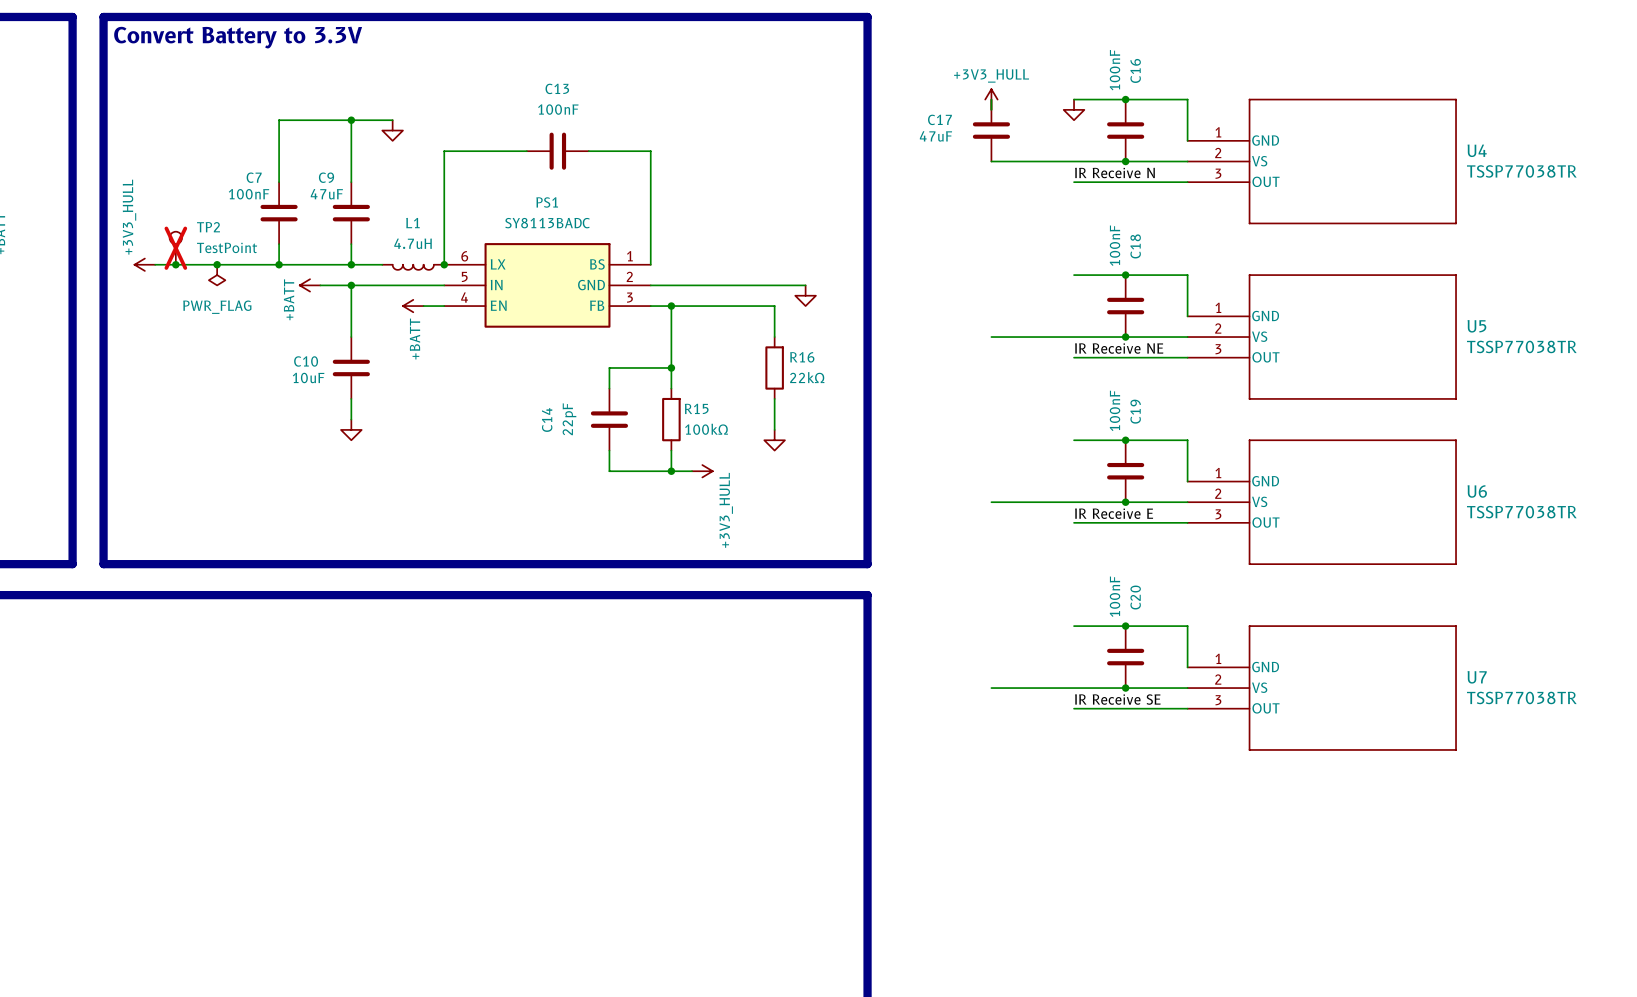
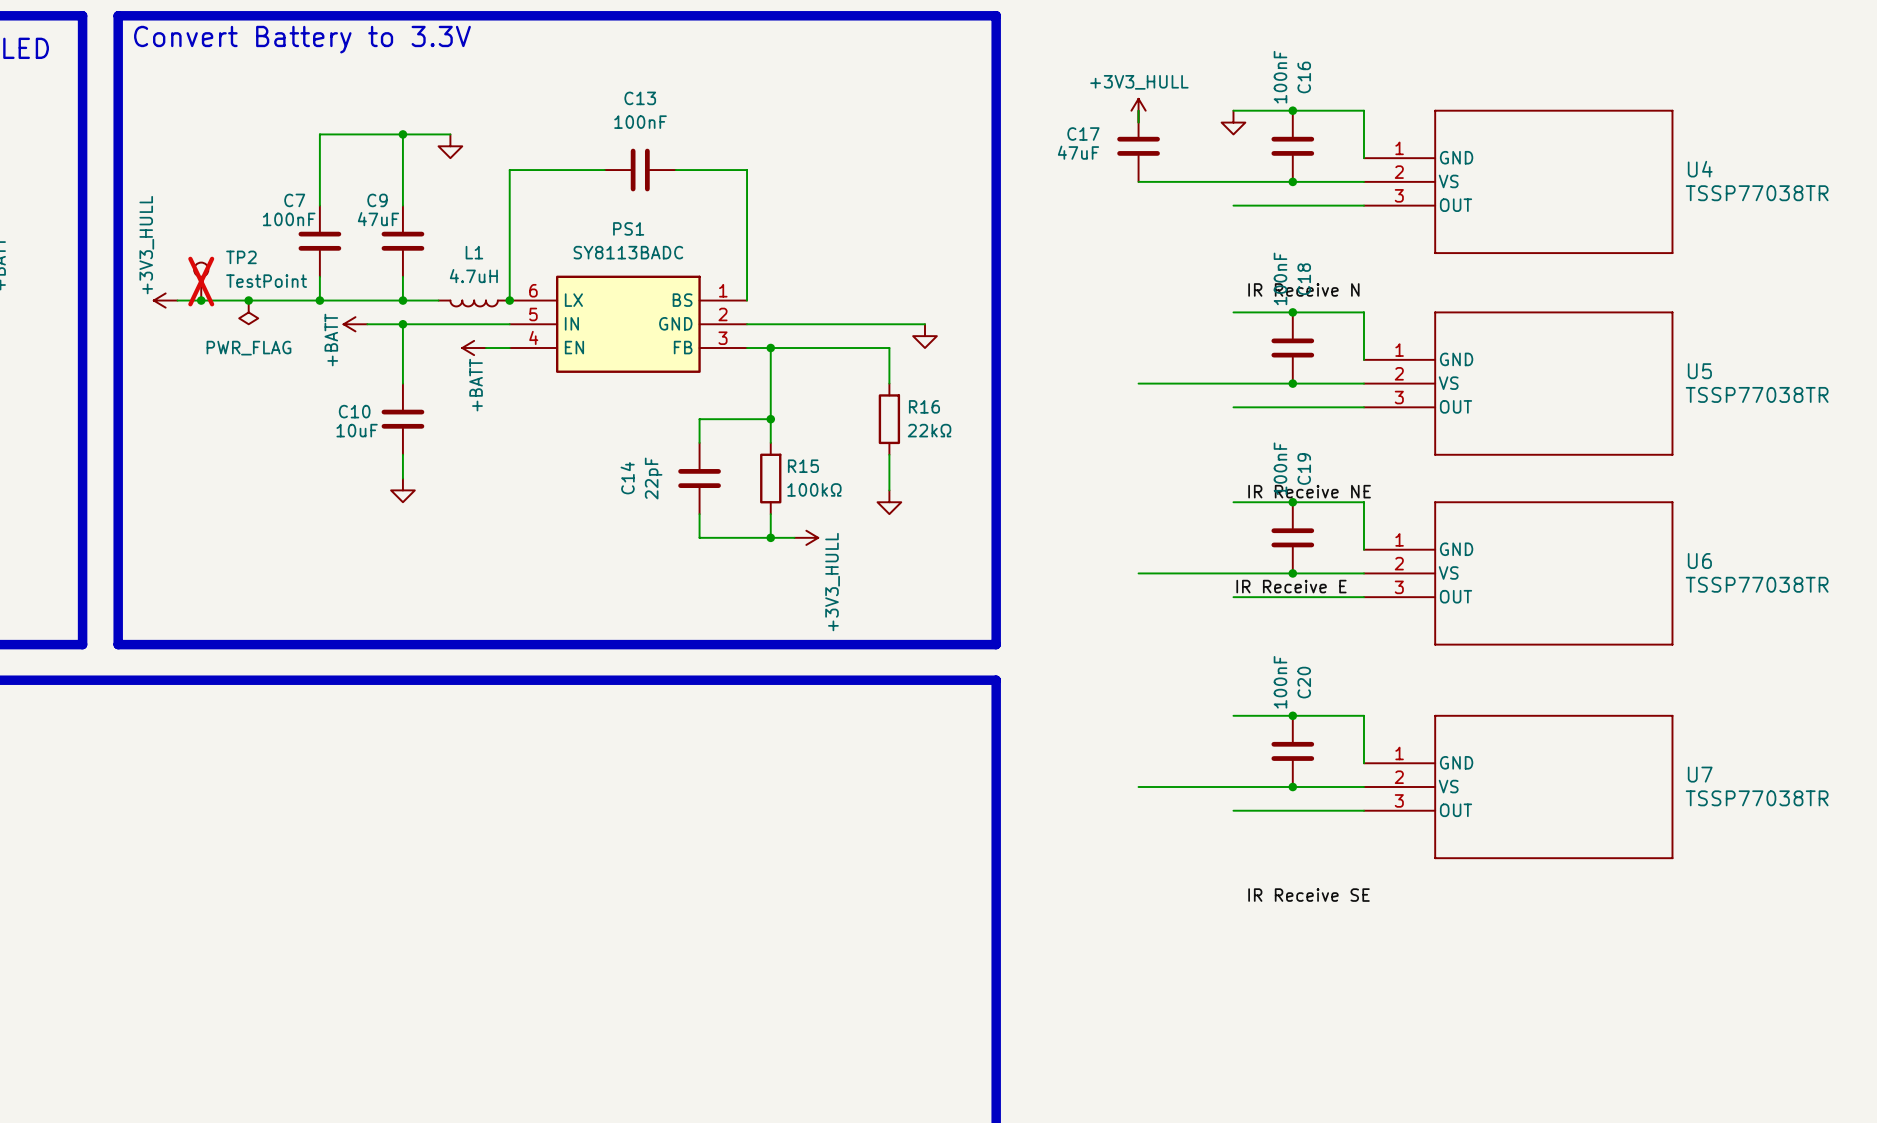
label position: IR Receive N (1114, 173) -> IR Receive N (1303, 289)
label position: IR Receive NE (1119, 348) -> IR Receive NE (1309, 491)
label position: IR Receive SE (1117, 699) -> IR Receive SE (1308, 895)

